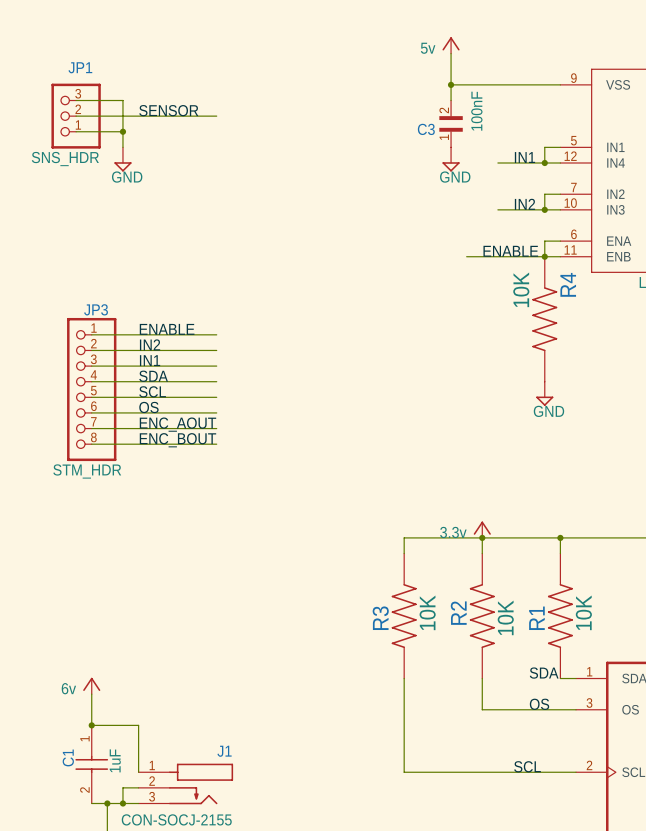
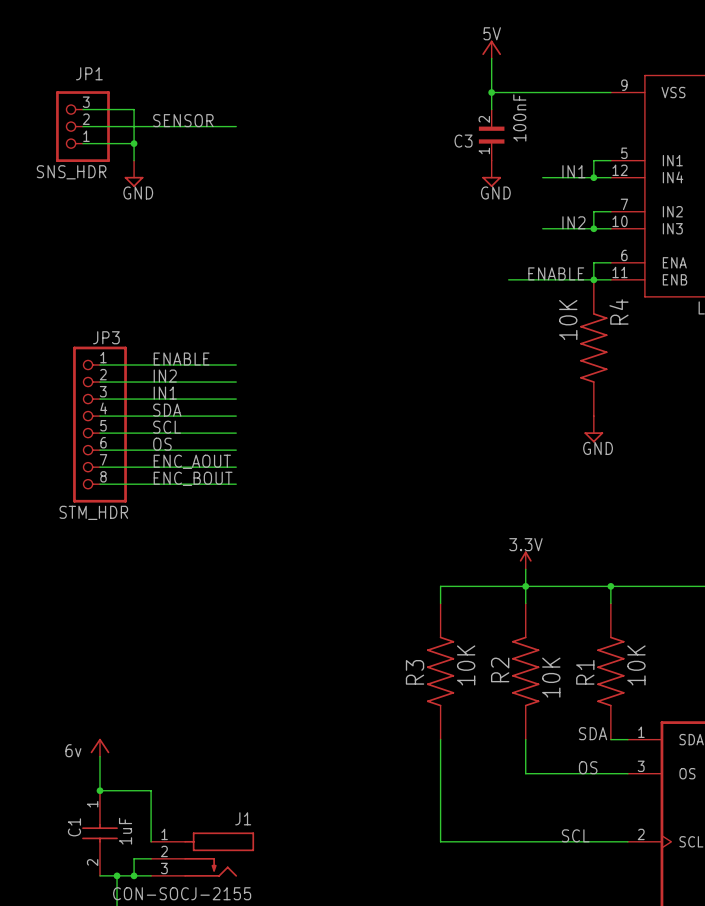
power symbol text: none -> 5V (492, 33)
power symbol text: 5v (428, 48) -> none
power symbol: none -> 3.3V (525, 560)
power symbol: (482, 529) -> none

